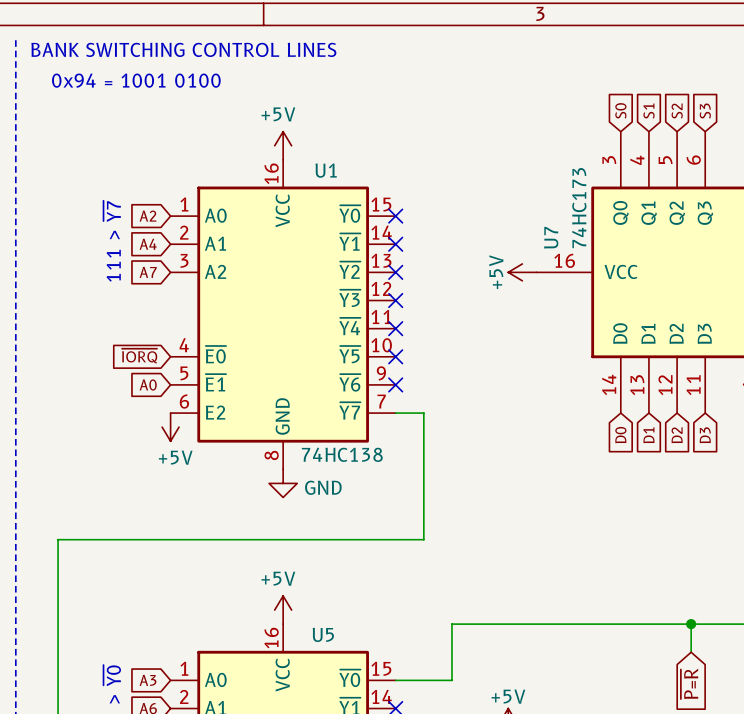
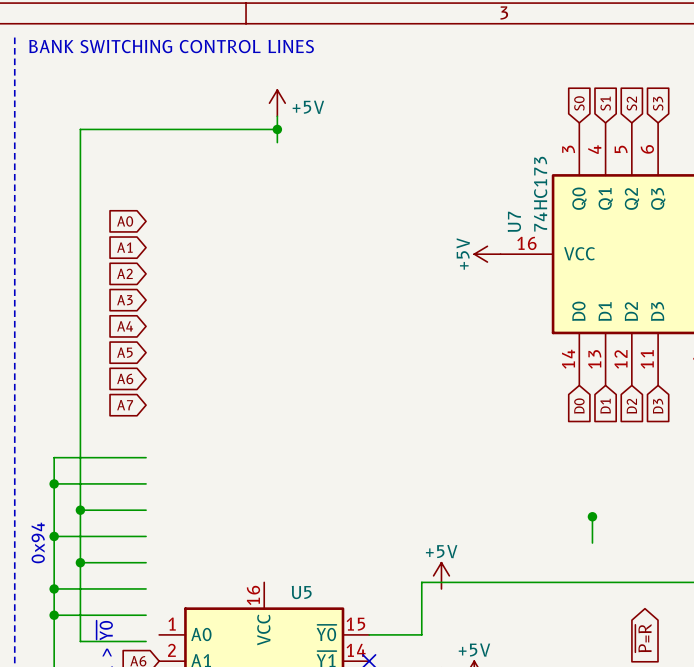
text: 0x94 = 1001 0100 (136, 80) -> none
power symbol text position: +5V (278, 114) -> +5V (308, 107)
wire: none -> (277, 116) (277, 142)
wire: none -> (277, 129) (80, 129) (80, 641) (146, 641)
junction: none -> (277, 129)
power symbol position: +5V (283, 145) -> +5V (277, 103)
global label position: A2 (147, 216) -> A2 (124, 273)
no-connect mark: (395, 216) -> none
text: 111 > ~{Y7} (112, 241) -> none
global label position: A4 (148, 244) -> A4 (125, 326)
no-connect mark: (395, 244) -> none
global label: none -> A1 (124, 247)
global label position: A7 (148, 272) -> A7 (125, 405)
no-connect mark: (395, 272) -> none
no-connect mark: (395, 300) -> none
U1: 74HC138 (283, 314) -> none
global label: none -> A3 (124, 300)
no-connect mark: (395, 328) -> none
global label: ~{IORQ} (139, 356) -> none
no-connect mark: (395, 356) -> none
global label: none -> A5 (124, 352)
global label position: A0 (148, 384) -> A0 (125, 221)
no-connect mark: (395, 384) -> none
global label: none -> A6 (125, 378)
wire: (395, 413) (423, 413) (423, 539) (58, 539) -> (146, 457) (54, 457) (54, 503)
power symbol: +5V (170, 427) -> none
power symbol: GND (283, 483) -> none
wire: none -> (54, 483) (146, 483)
junction: none -> (54, 483)
wire: none -> (80, 510) (146, 510)
junction: none -> (80, 510)
junction: none -> (592, 516)
wire: none -> (54, 536) (146, 536)
junction: none -> (54, 536)
text: none -> 0x94 (38, 542)
wire: none -> (80, 562) (146, 562)
junction: none -> (80, 562)
power symbol: +5V (283, 610) -> none
power symbol: none -> +5V (441, 575)
wire: (691, 624) (691, 652) -> (592, 516) (592, 543)
junction: (691, 624) -> none
wire: none -> (54, 588) (146, 588)
junction: none -> (54, 588)
wire: none -> (54, 615) (146, 615)
junction: none -> (54, 615)
global label: A3 (147, 680) -> none

